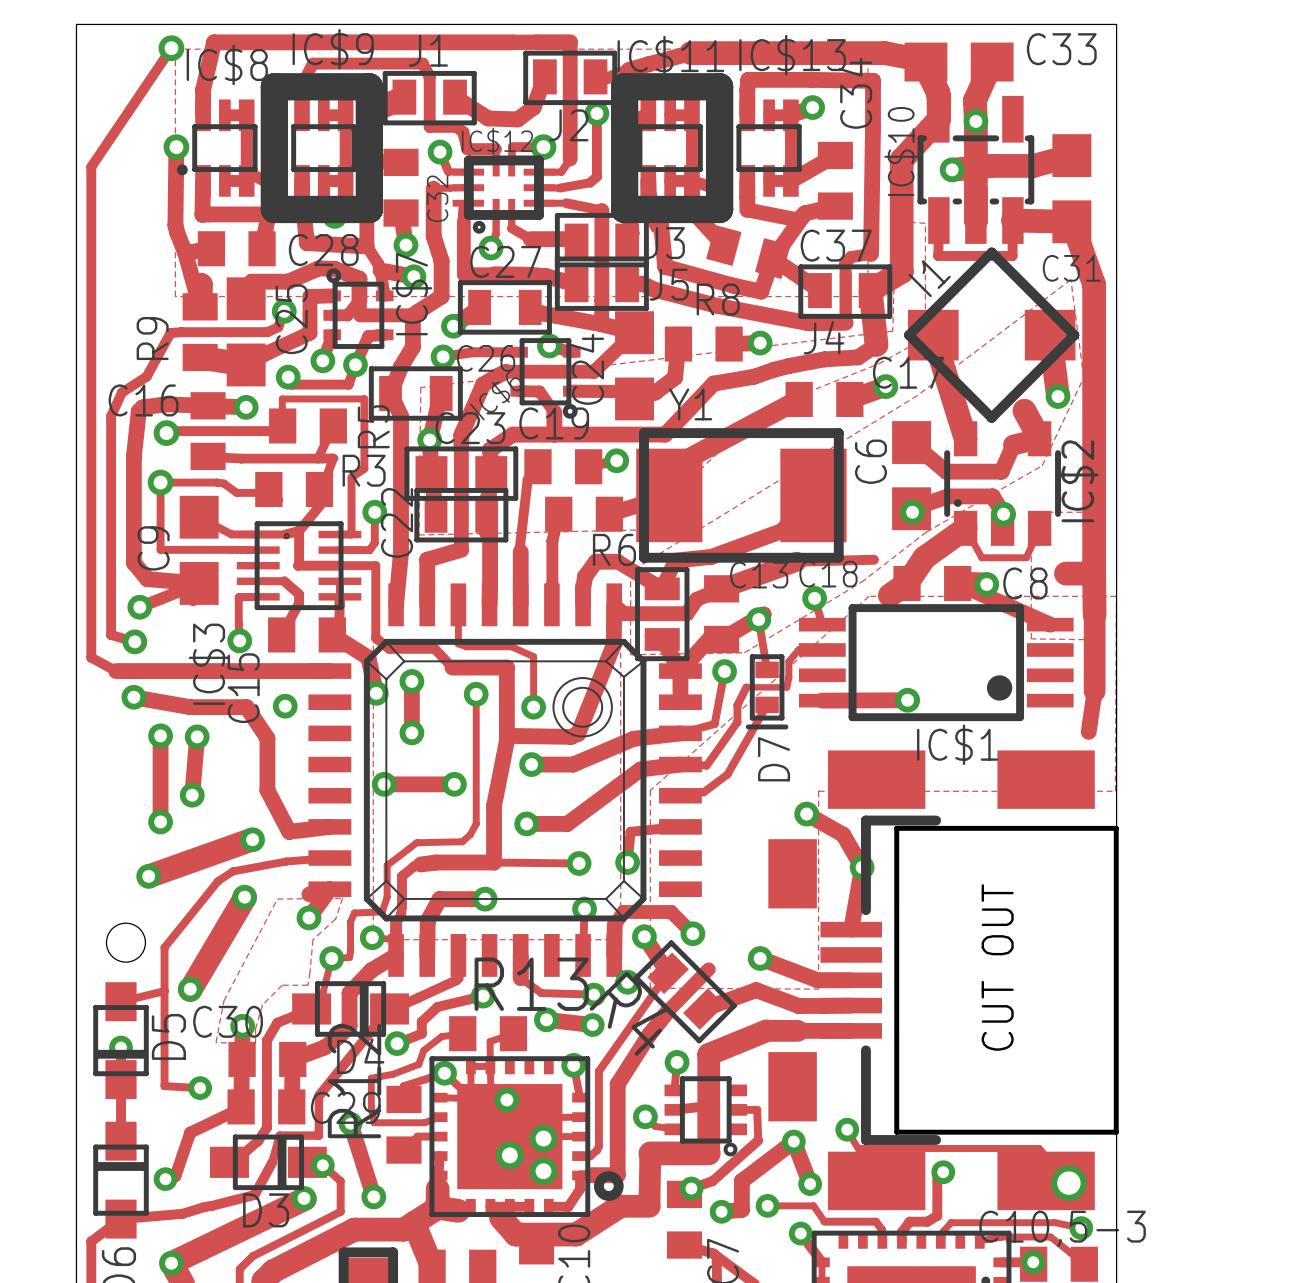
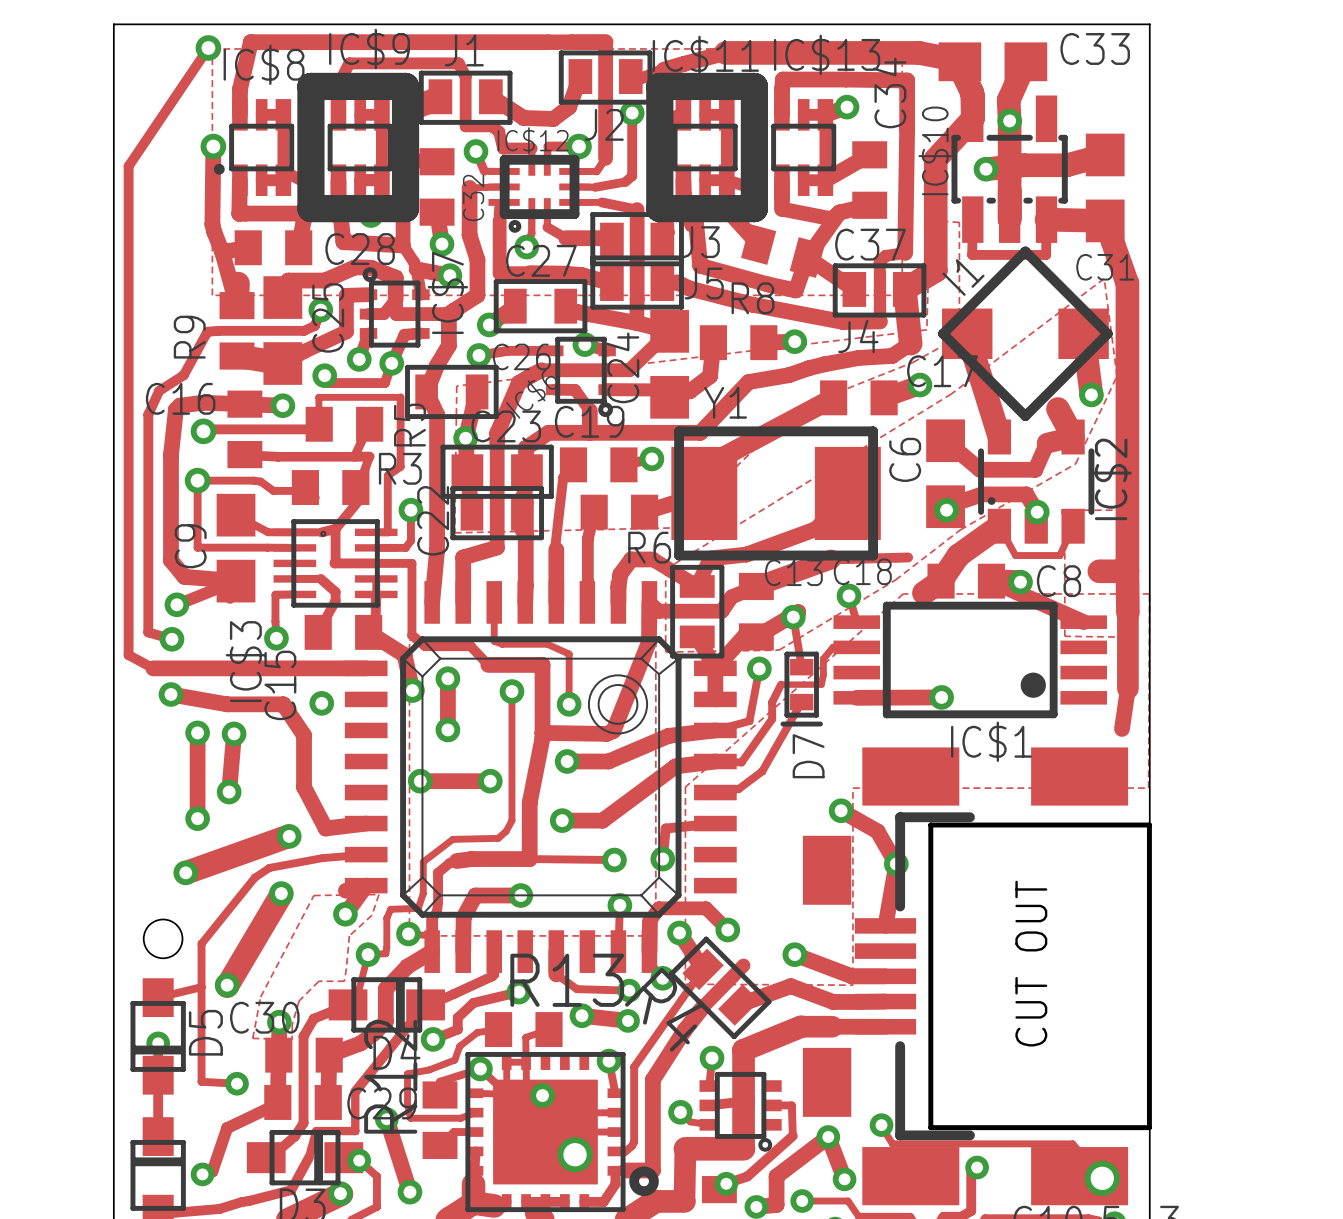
via: (543, 1138) -> none
via: (509, 1155) -> none
via: none -> (575, 1154)
via: (543, 1171) -> none

